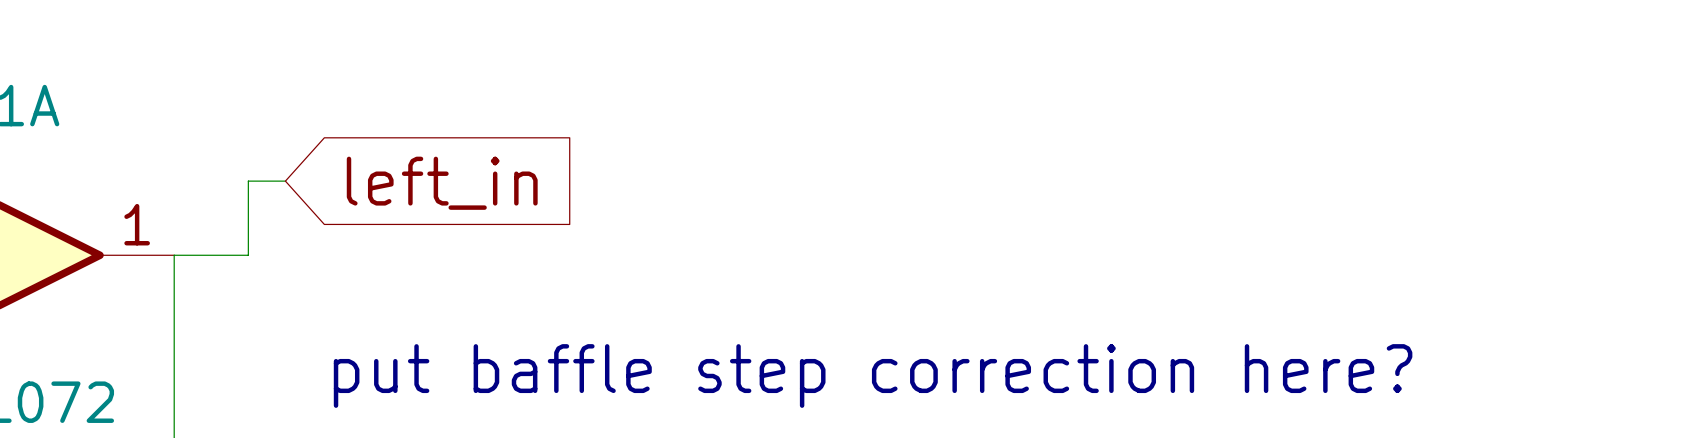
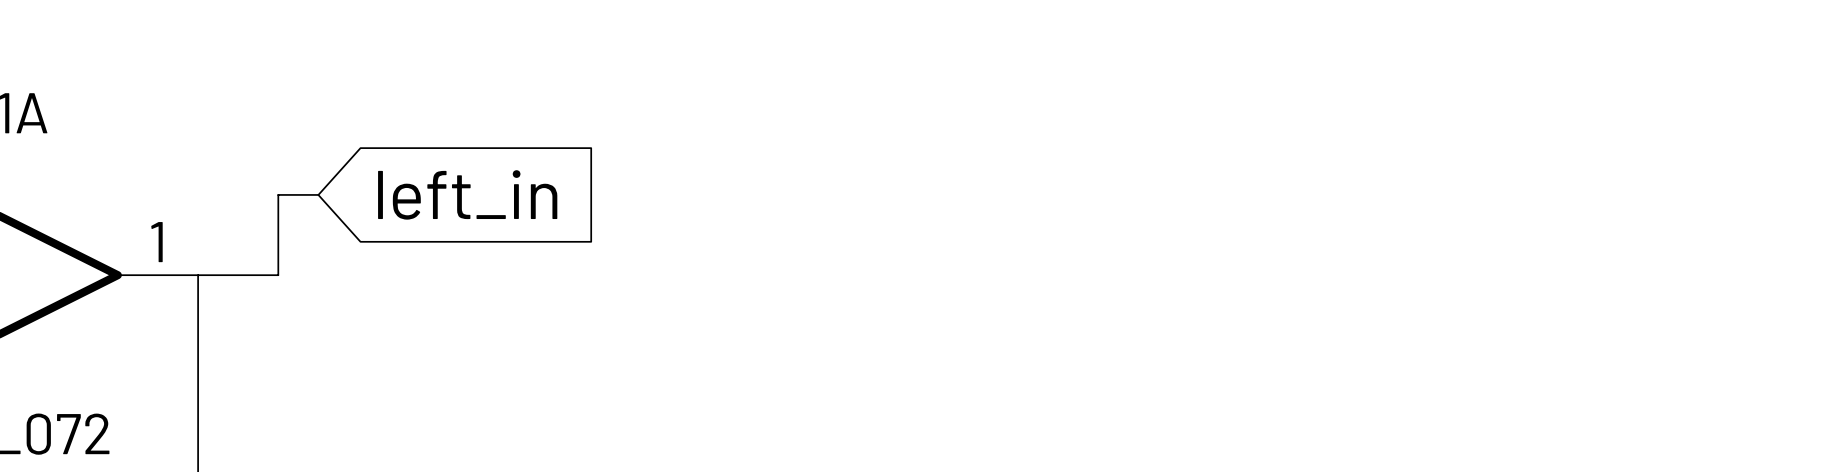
text: put baffle step correction here? (873, 376) -> none

